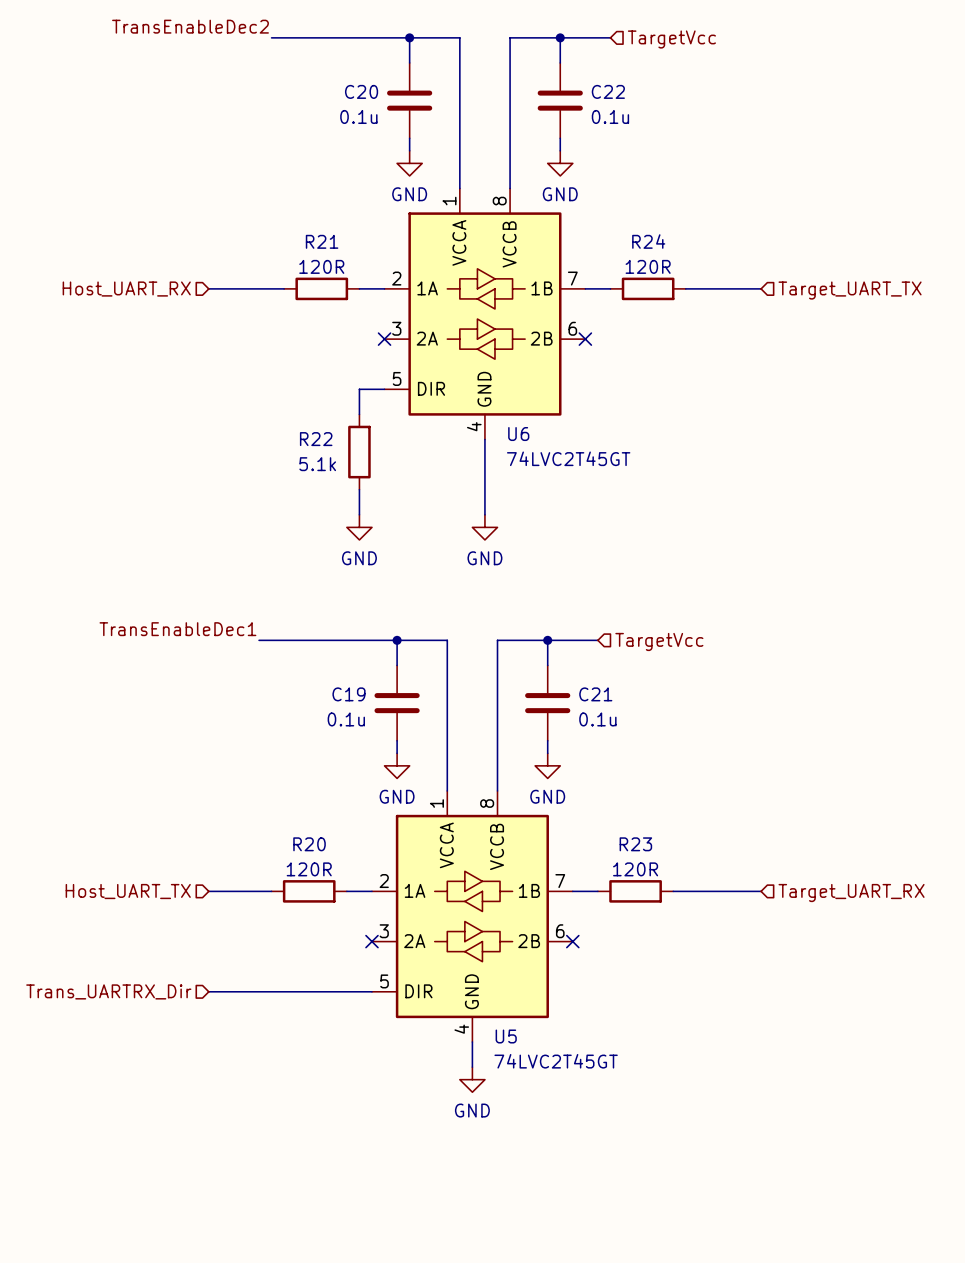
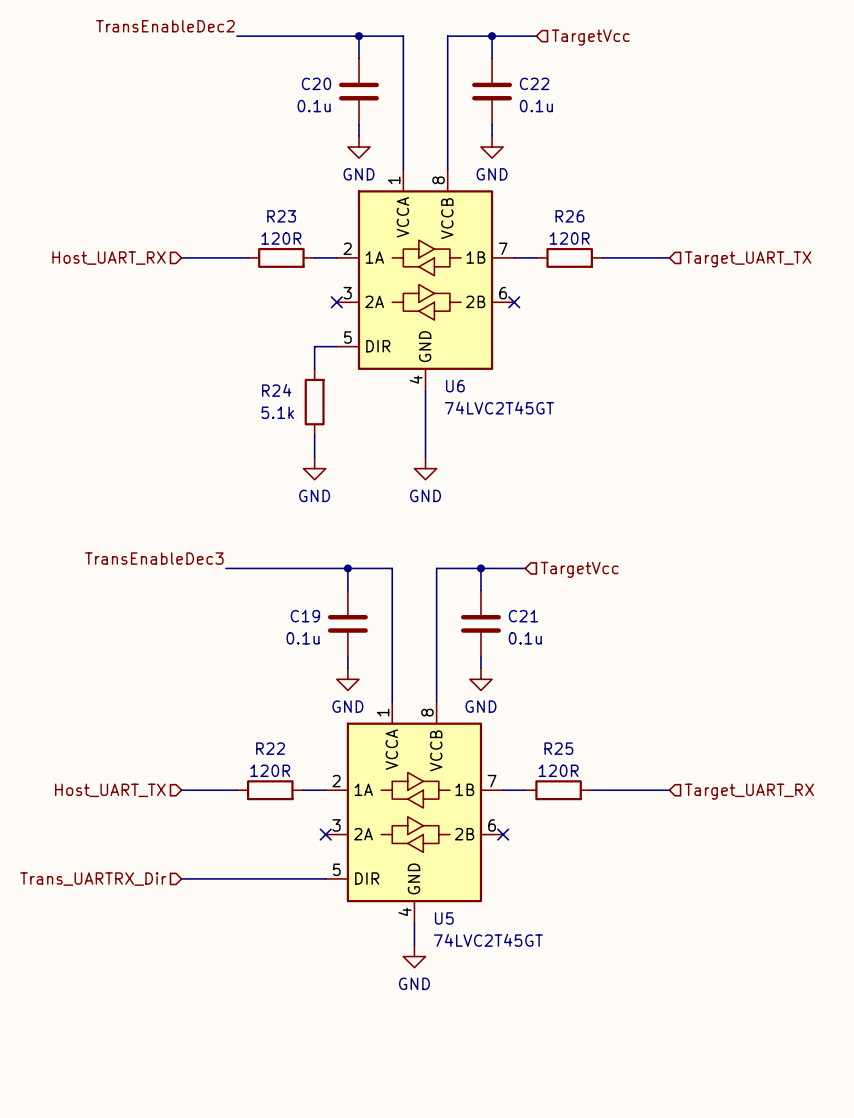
R21 name: R21 (322, 241) -> R23 (281, 216)
R24 name: R24 (648, 241) -> R26 (569, 216)
R22 name: R22 (316, 439) -> R24 (276, 390)
label: TransEnableDec1 (177, 629) -> TransEnableDec3 (154, 558)
R20 name: R20 (309, 844) -> R22 (270, 748)
R23 name: R23 (635, 844) -> R25 (558, 748)

